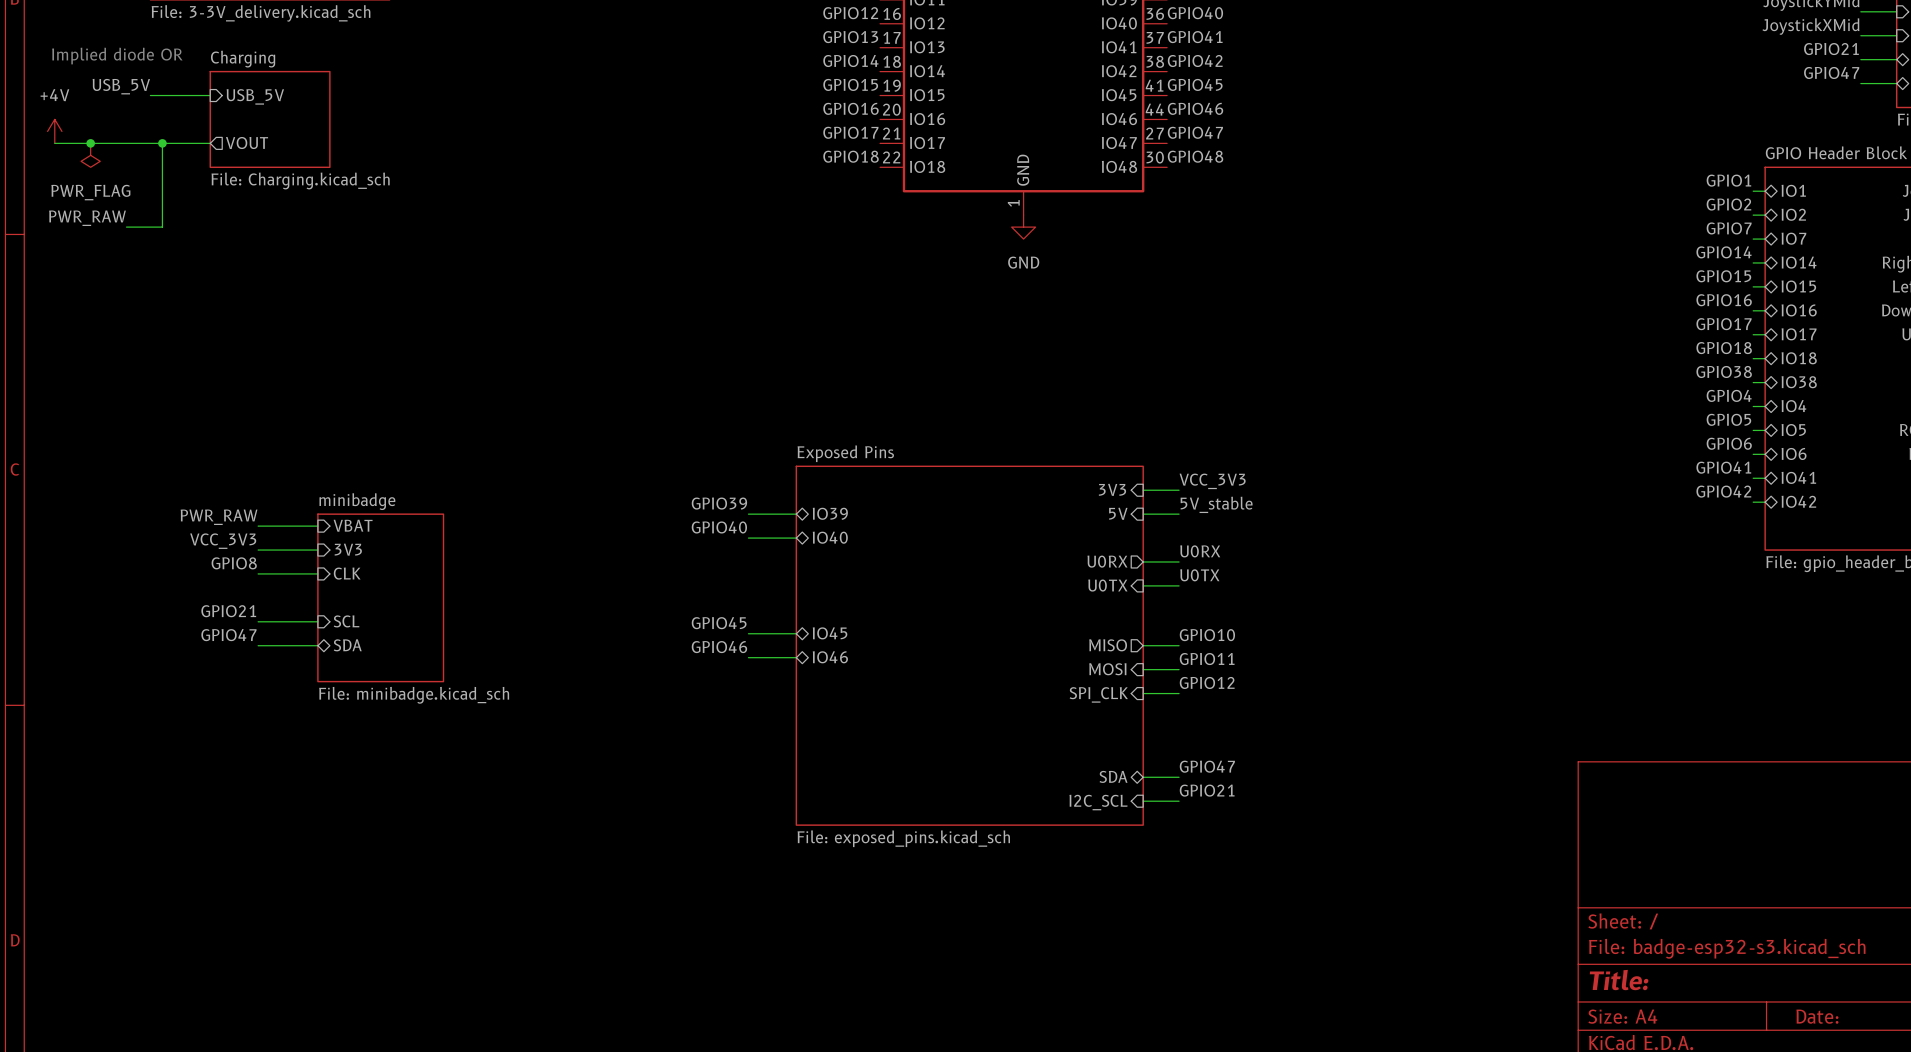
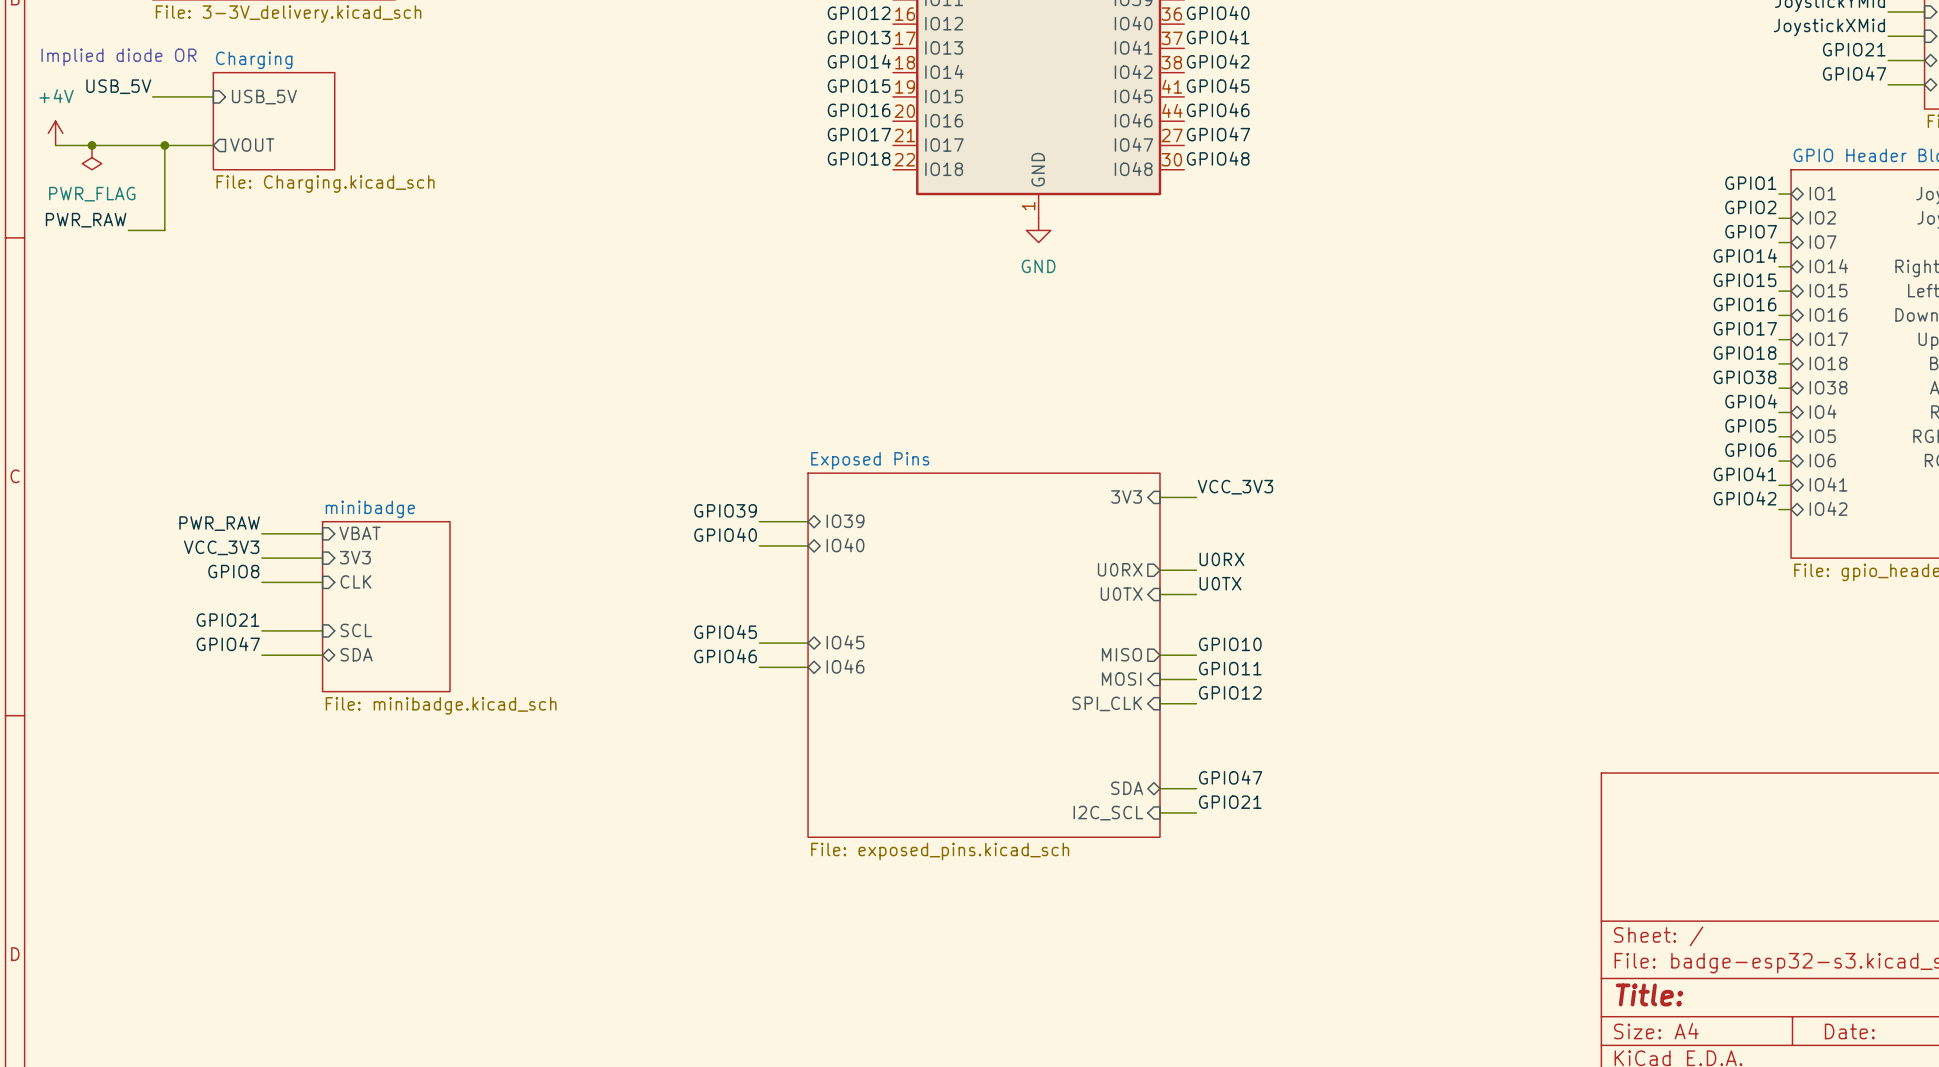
label: 5V_stable (1216, 504) -> none
sheet pin: 5V (1118, 513) -> none
wire: (1143, 514) (1179, 514) -> none

